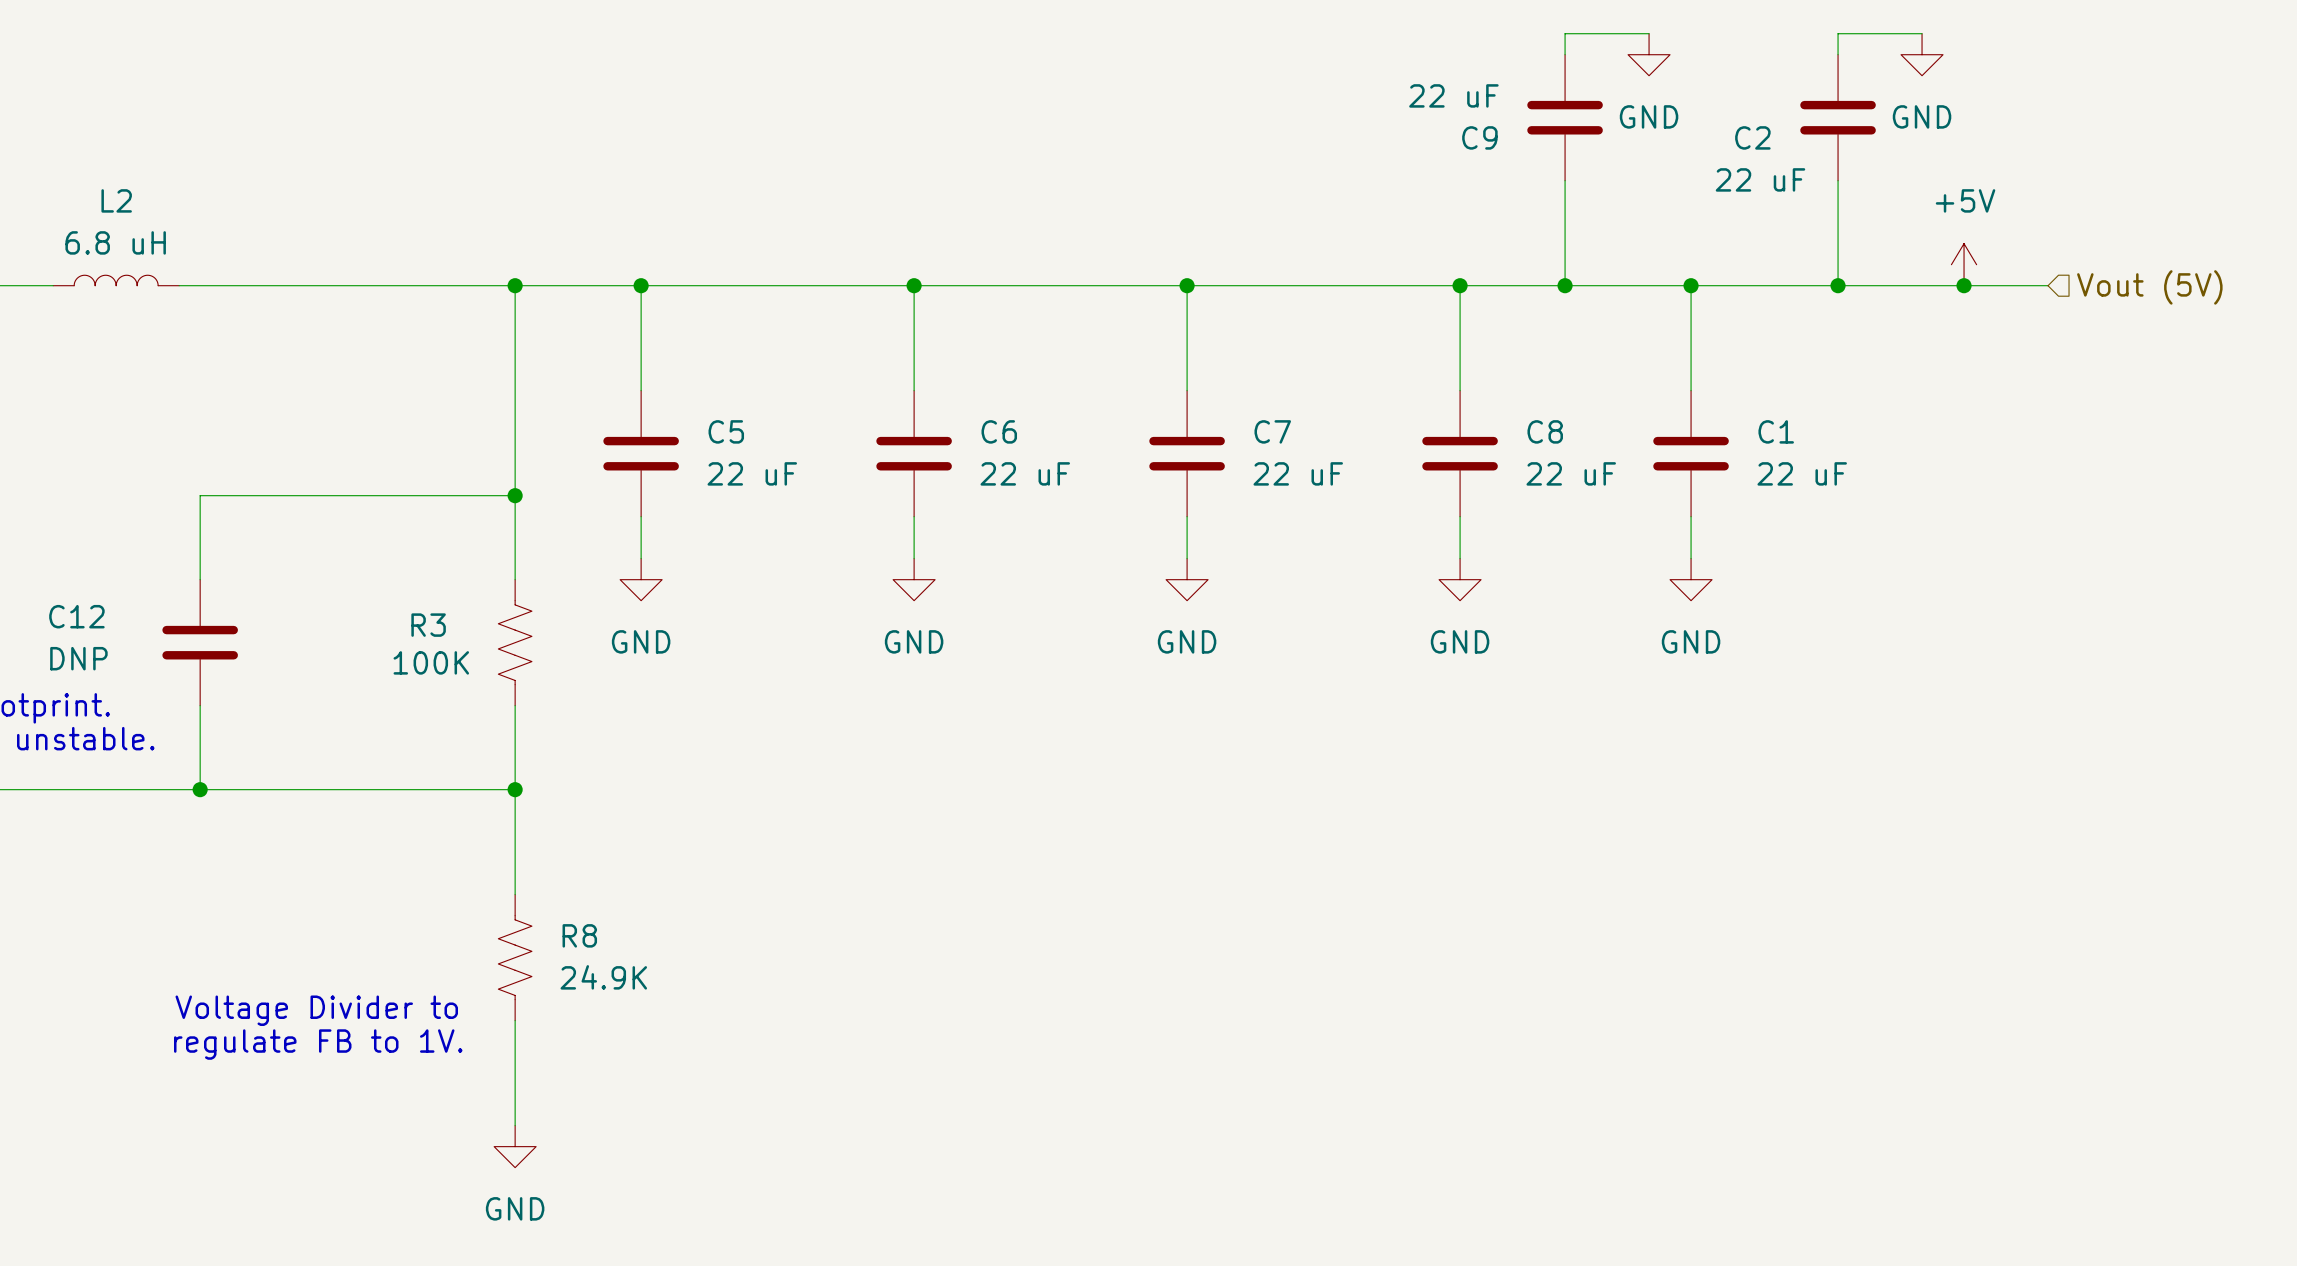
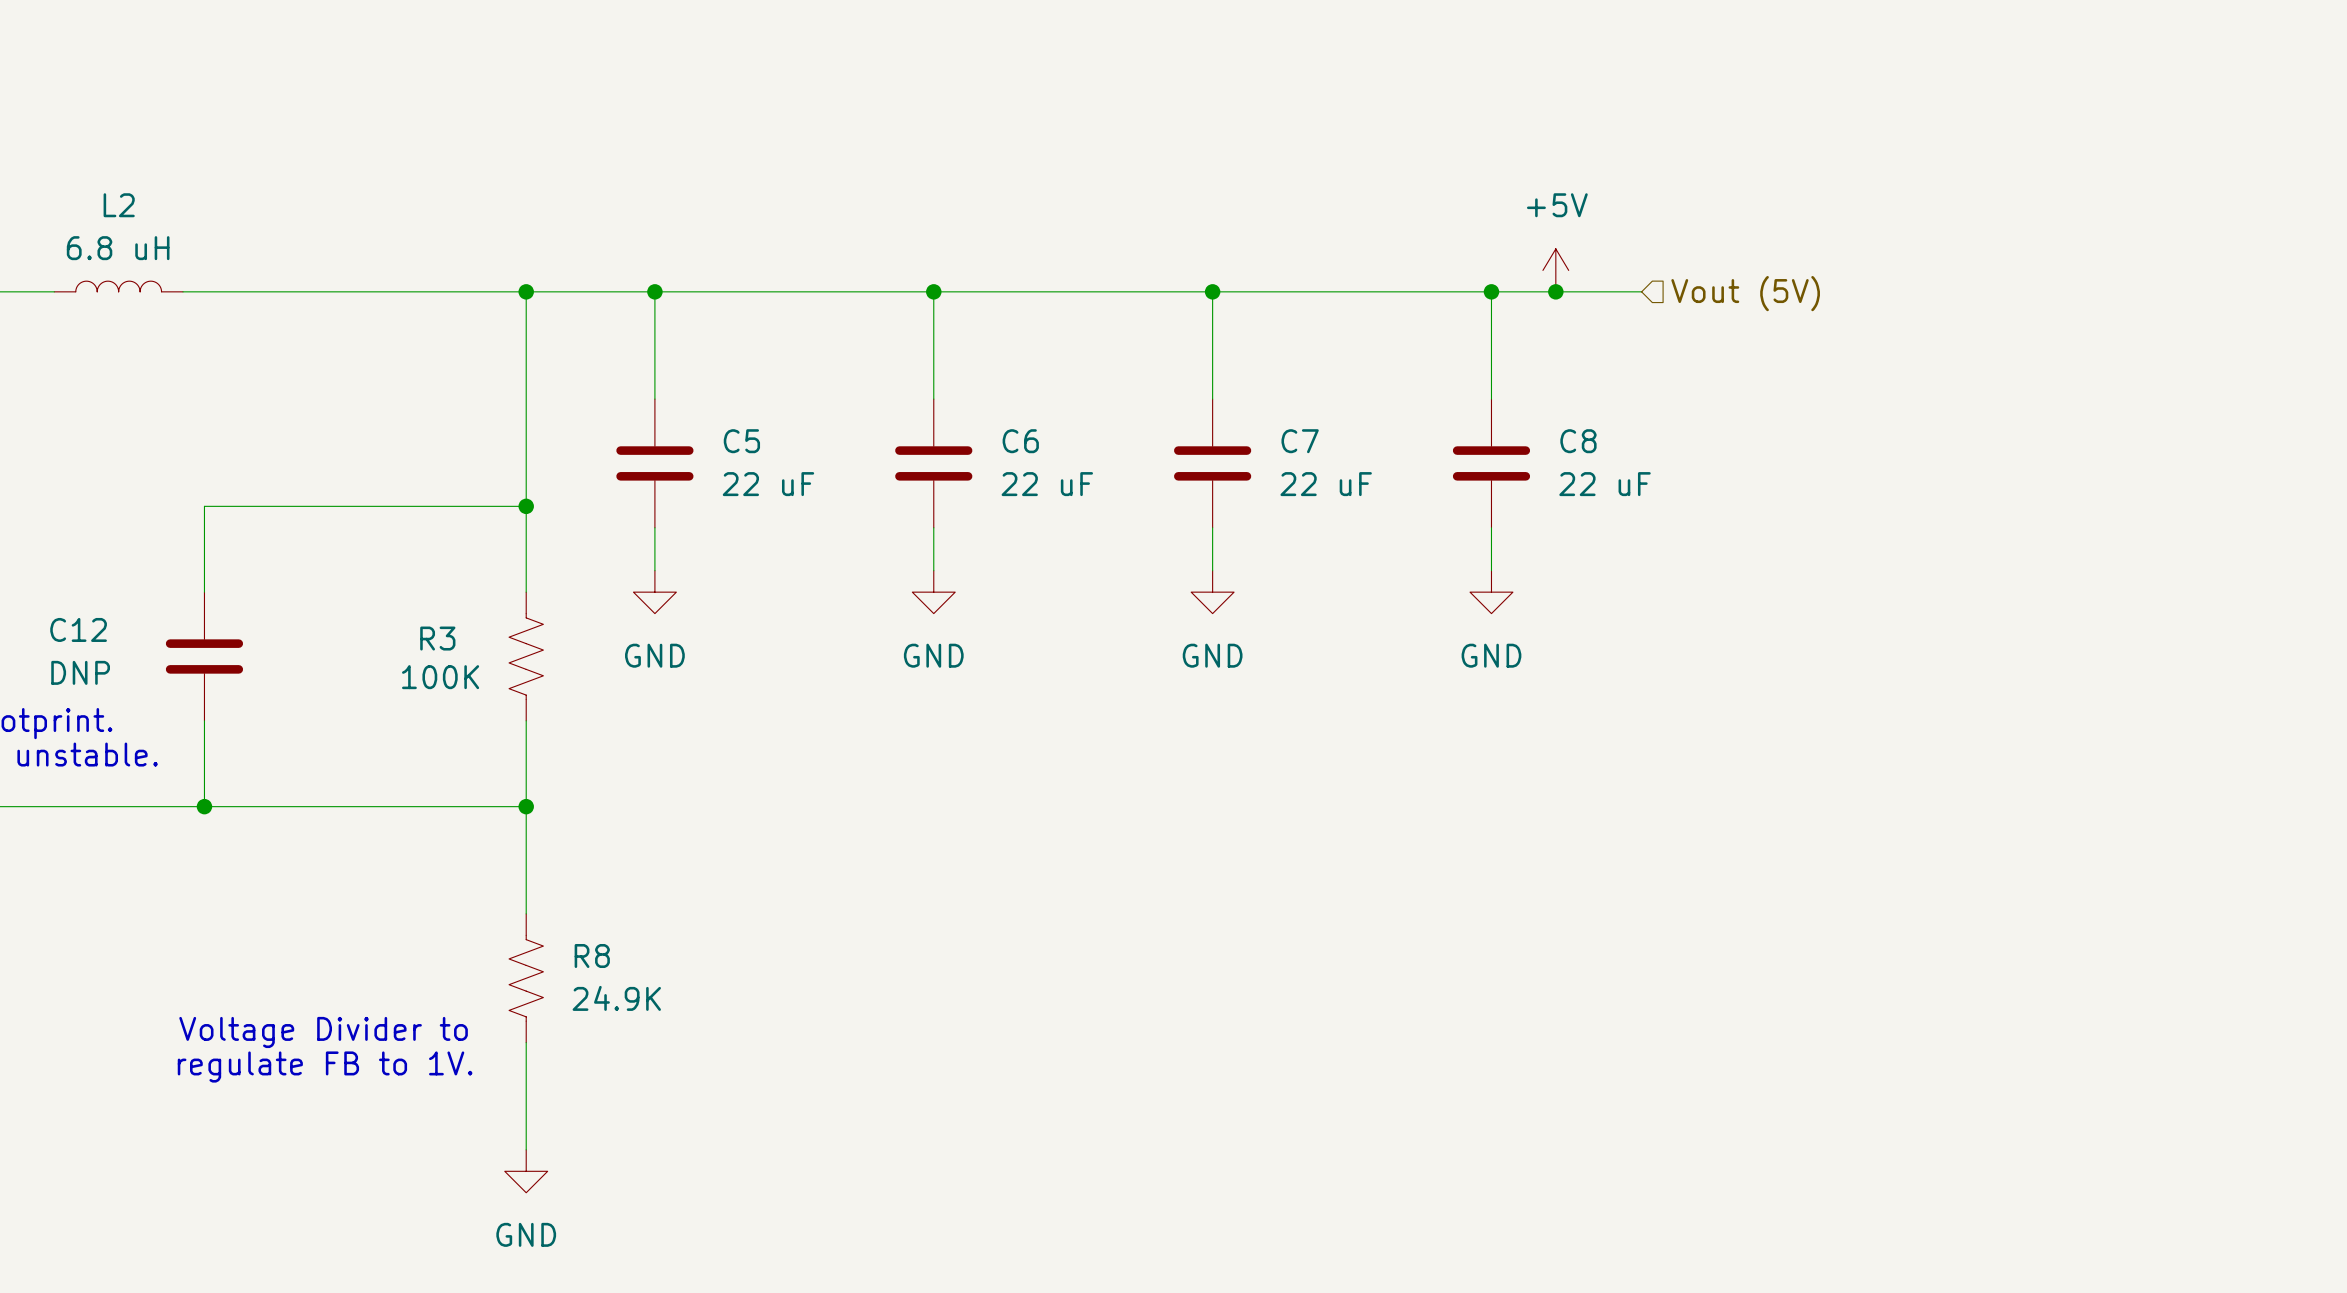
wire: (1649, 33) (1565, 33) (1565, 54) -> none
wire: (1922, 33) (1838, 33) (1838, 54) -> none
power symbol: GND (1649, 54) -> none
power symbol: GND (1922, 54) -> none
C9: 22 uF (1565, 117) -> none
C2: 22 uF (1838, 117) -> none
wire: (1565, 180) (1565, 285) -> none
wire: (1838, 180) (1838, 285) -> none
power symbol: none -> +5V (1555, 270)
power symbol: +5V (1964, 264) -> none
junction position: (1565, 285) -> (1555, 291)
wire: (1607, 285) (2048, 285) -> none
wire: (1691, 285) (1691, 390) -> none
junction: (1691, 285) -> none
junction: (1838, 285) -> none
junction: (1964, 285) -> none
hierarchical label: none -> Vout (5V) (1745, 293)
hierarchical label: Vout (5V) (2149, 287) -> none
C1: 22 uF (1691, 453) -> none
wire: (1691, 516) (1691, 558) -> none
power symbol: GND (1691, 579) -> none

